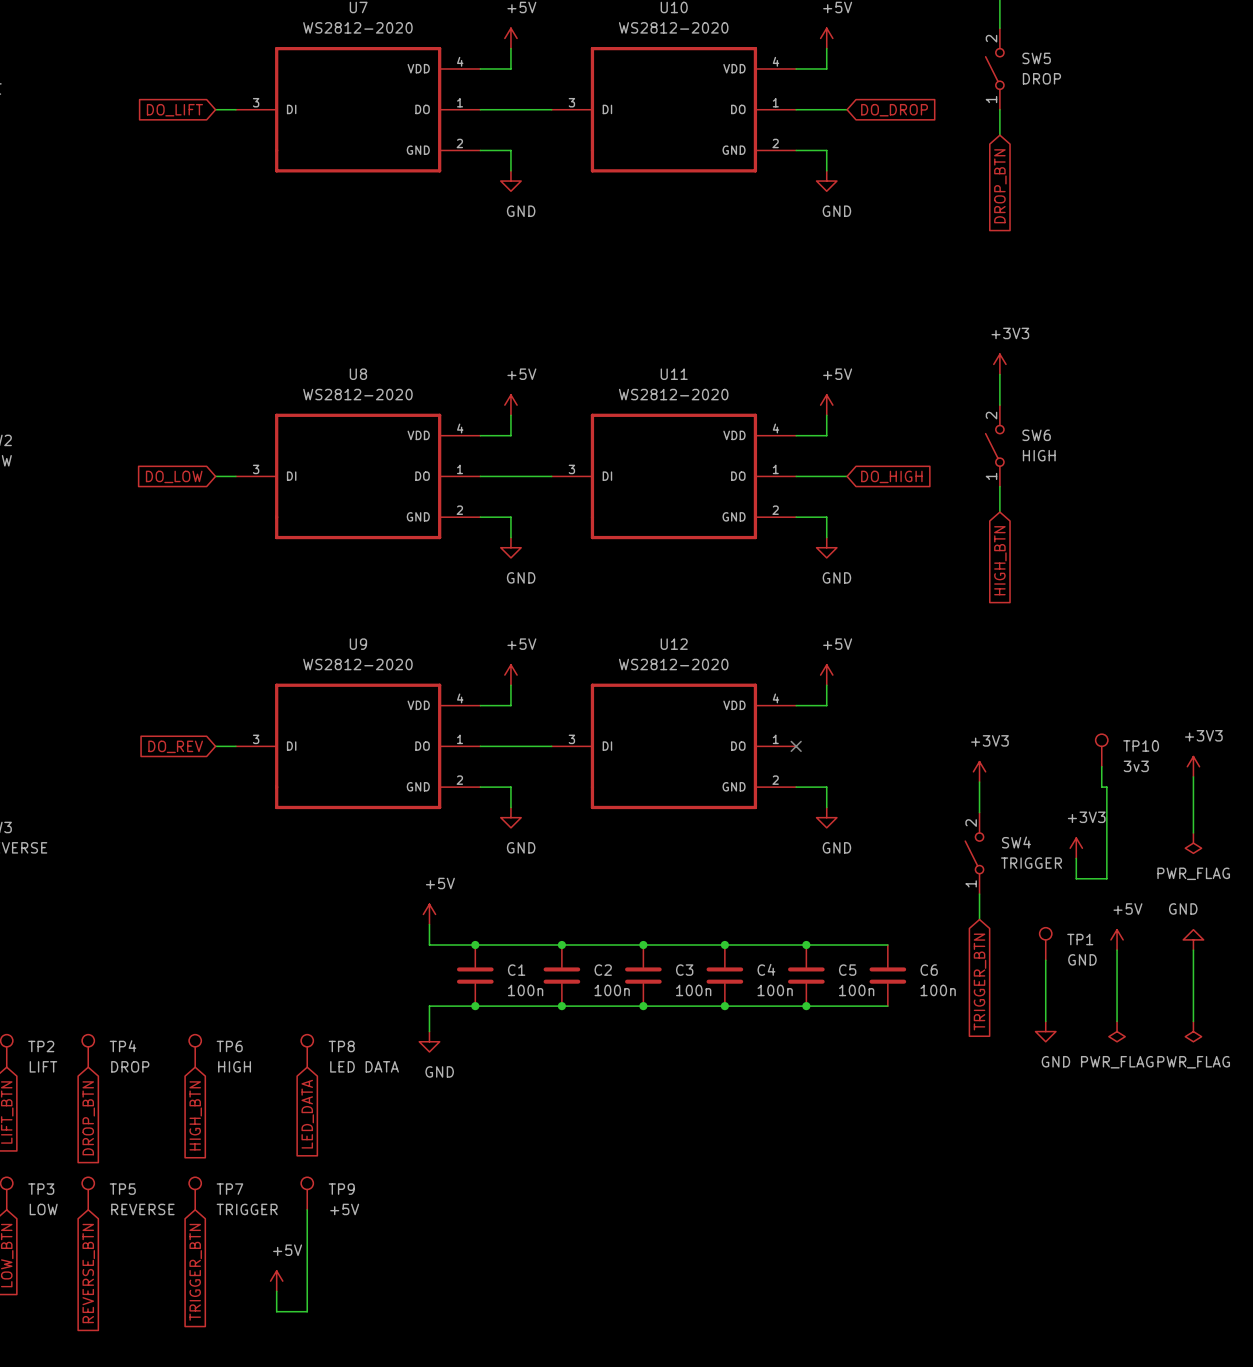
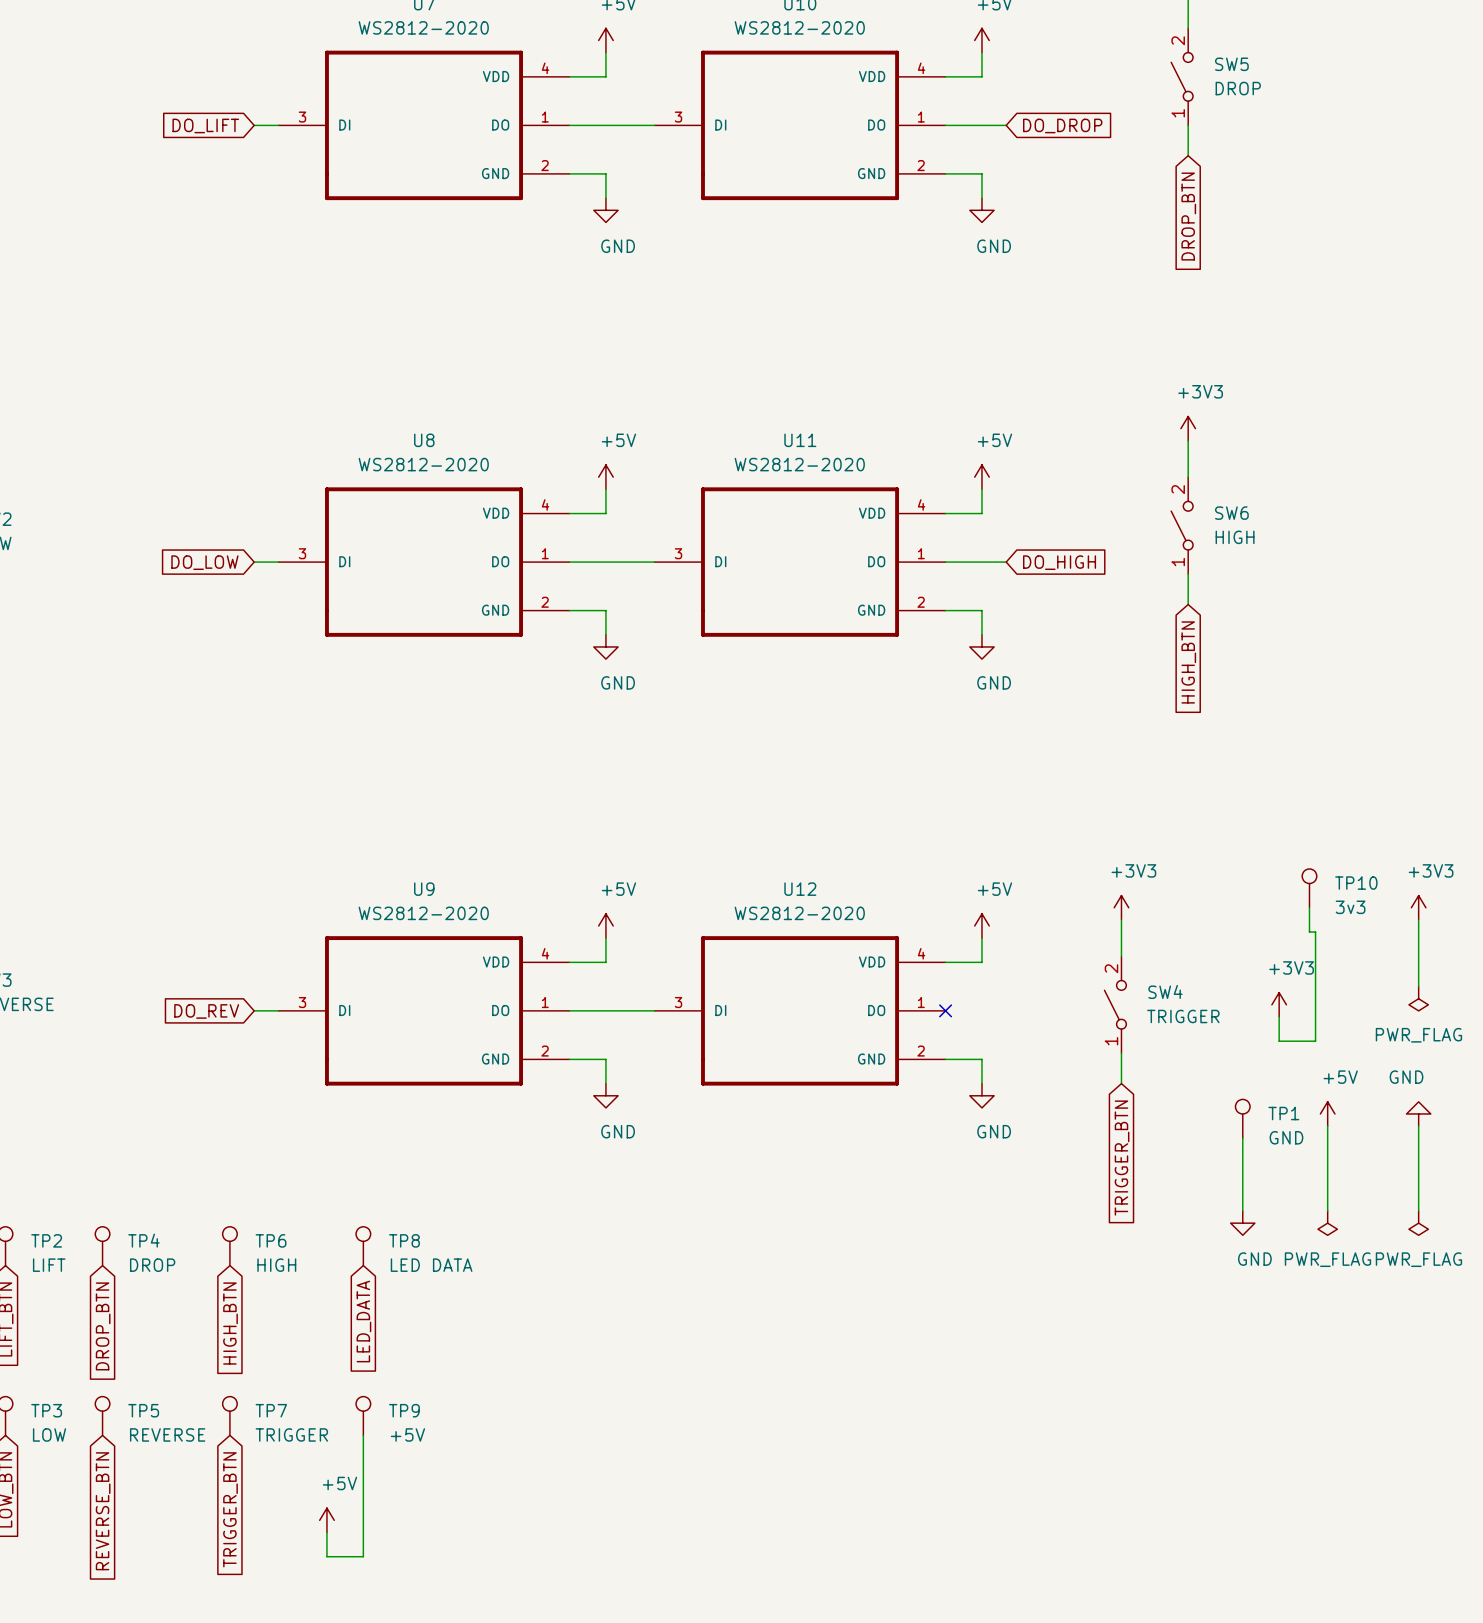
power symbol: +5V (510, 675) -> none
power symbol position: +5V (826, 675) -> +5V (981, 925)
wire: (510, 685) (510, 705) (480, 705) -> none
wire: (826, 685) (826, 705) (796, 705) -> none
global label position: DO_REV (175, 746) -> DO_REV (206, 1011)
wire: (215, 746) (235, 746) -> (254, 1010) (278, 1010)
U9 position: (358, 746) -> (424, 1010)
wire: (480, 746) (551, 746) -> (569, 1010) (654, 1010)
U12 position: (673, 746) -> (800, 1010)
no-connect mark: (796, 746) -> none
power symbol position: +3V3 (979, 771) -> +3V3 (1121, 907)
power symbol: none -> +5V (605, 925)
wire: (979, 782) (979, 812) -> (1121, 919) (1121, 956)
wire: (480, 787) (510, 787) (510, 792) -> none
wire: (796, 787) (826, 787) (826, 792) -> none
wire: none -> (605, 956) (605, 962) (569, 962)
wire: none -> (981, 956) (981, 962) (945, 962)
power symbol: GND (510, 817) -> none
power symbol position: GND (826, 817) -> GND (981, 1095)
no-connect mark: none -> (945, 1010)
SW4 position: (974, 853) -> (1115, 1004)
wire: none -> (569, 1059) (605, 1059) (605, 1083)
wire: none -> (945, 1059) (981, 1059) (981, 1083)
wire: (979, 894) (979, 919) -> (1121, 1053) (1121, 1083)
power symbol: +5V (429, 914) -> none
wire: (429, 924) (429, 945) (887, 945) -> none
power symbol: none -> GND (605, 1095)
junction: (475, 945) -> none
junction: (561, 945) -> none
junction: (643, 945) -> none
junction: (724, 945) -> none
junction: (806, 945) -> none
C1: 100n (475, 975) -> none
C2: 100n (561, 975) -> none
C3: 100n (643, 975) -> none
C4: 100n (724, 975) -> none
C5: 100n (806, 975) -> none
C6: 100n (887, 975) -> none
global label position: TRIGGER_BTN (980, 982) -> TRIGGER_BTN (1122, 1158)
junction: (475, 1006) -> none
junction: (561, 1006) -> none
junction: (643, 1006) -> none
junction: (724, 1006) -> none
junction: (806, 1006) -> none
wire: (887, 1006) (429, 1006) (429, 1031) -> none
power symbol: GND (429, 1041) -> none

